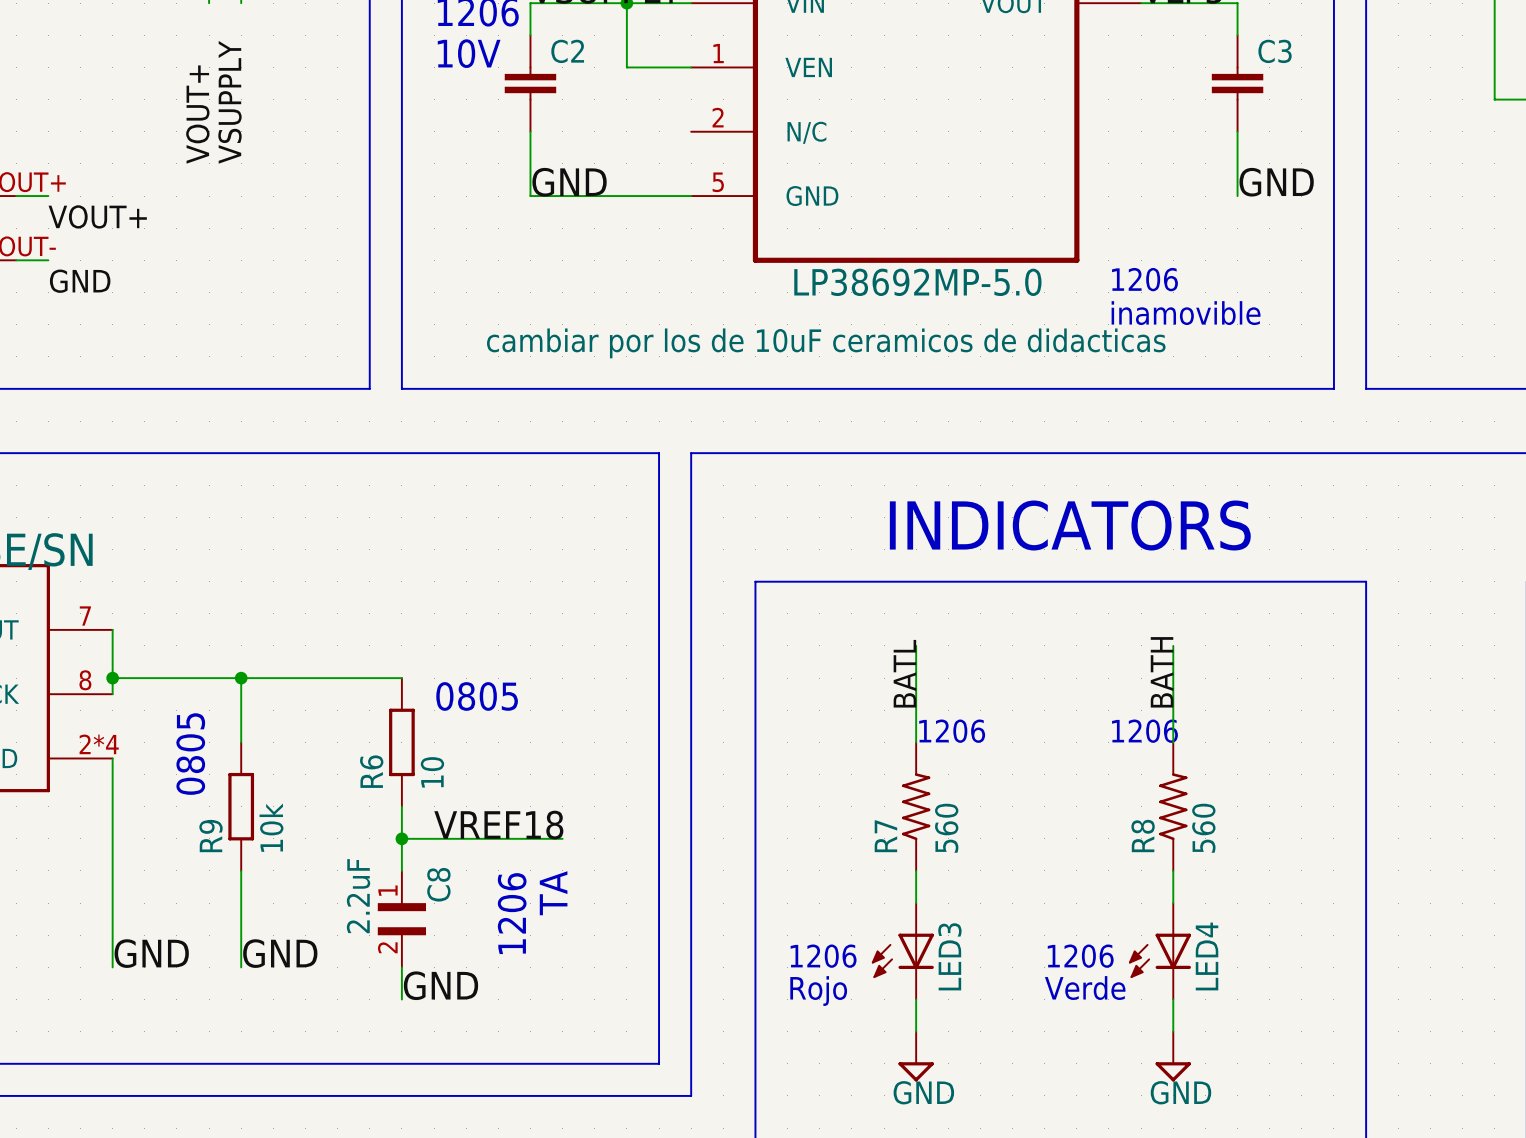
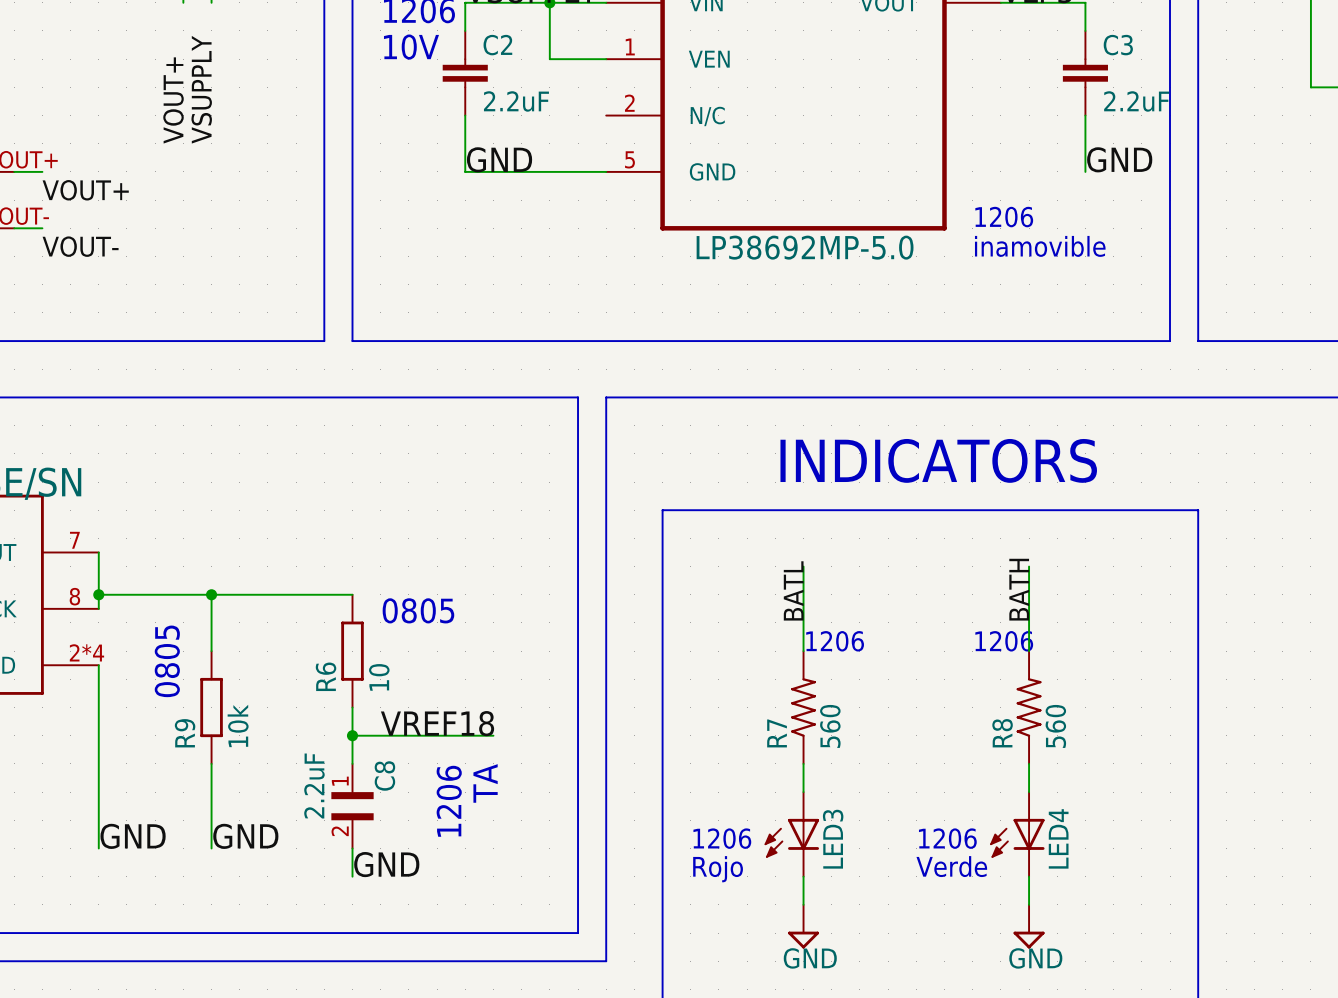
C3 value: none -> 2.2uF (1136, 101)
text: none -> 1206 (1004, 217)
text: 1206 (1144, 279) -> inamovible (1040, 246)
label: GND (80, 281) -> VOUT- (80, 246)
text: inamovible (1186, 313) -> none
C2 value: cambiar por los de 10uF ceramicos de didacticas (826, 343) -> 2.2uF (516, 101)

